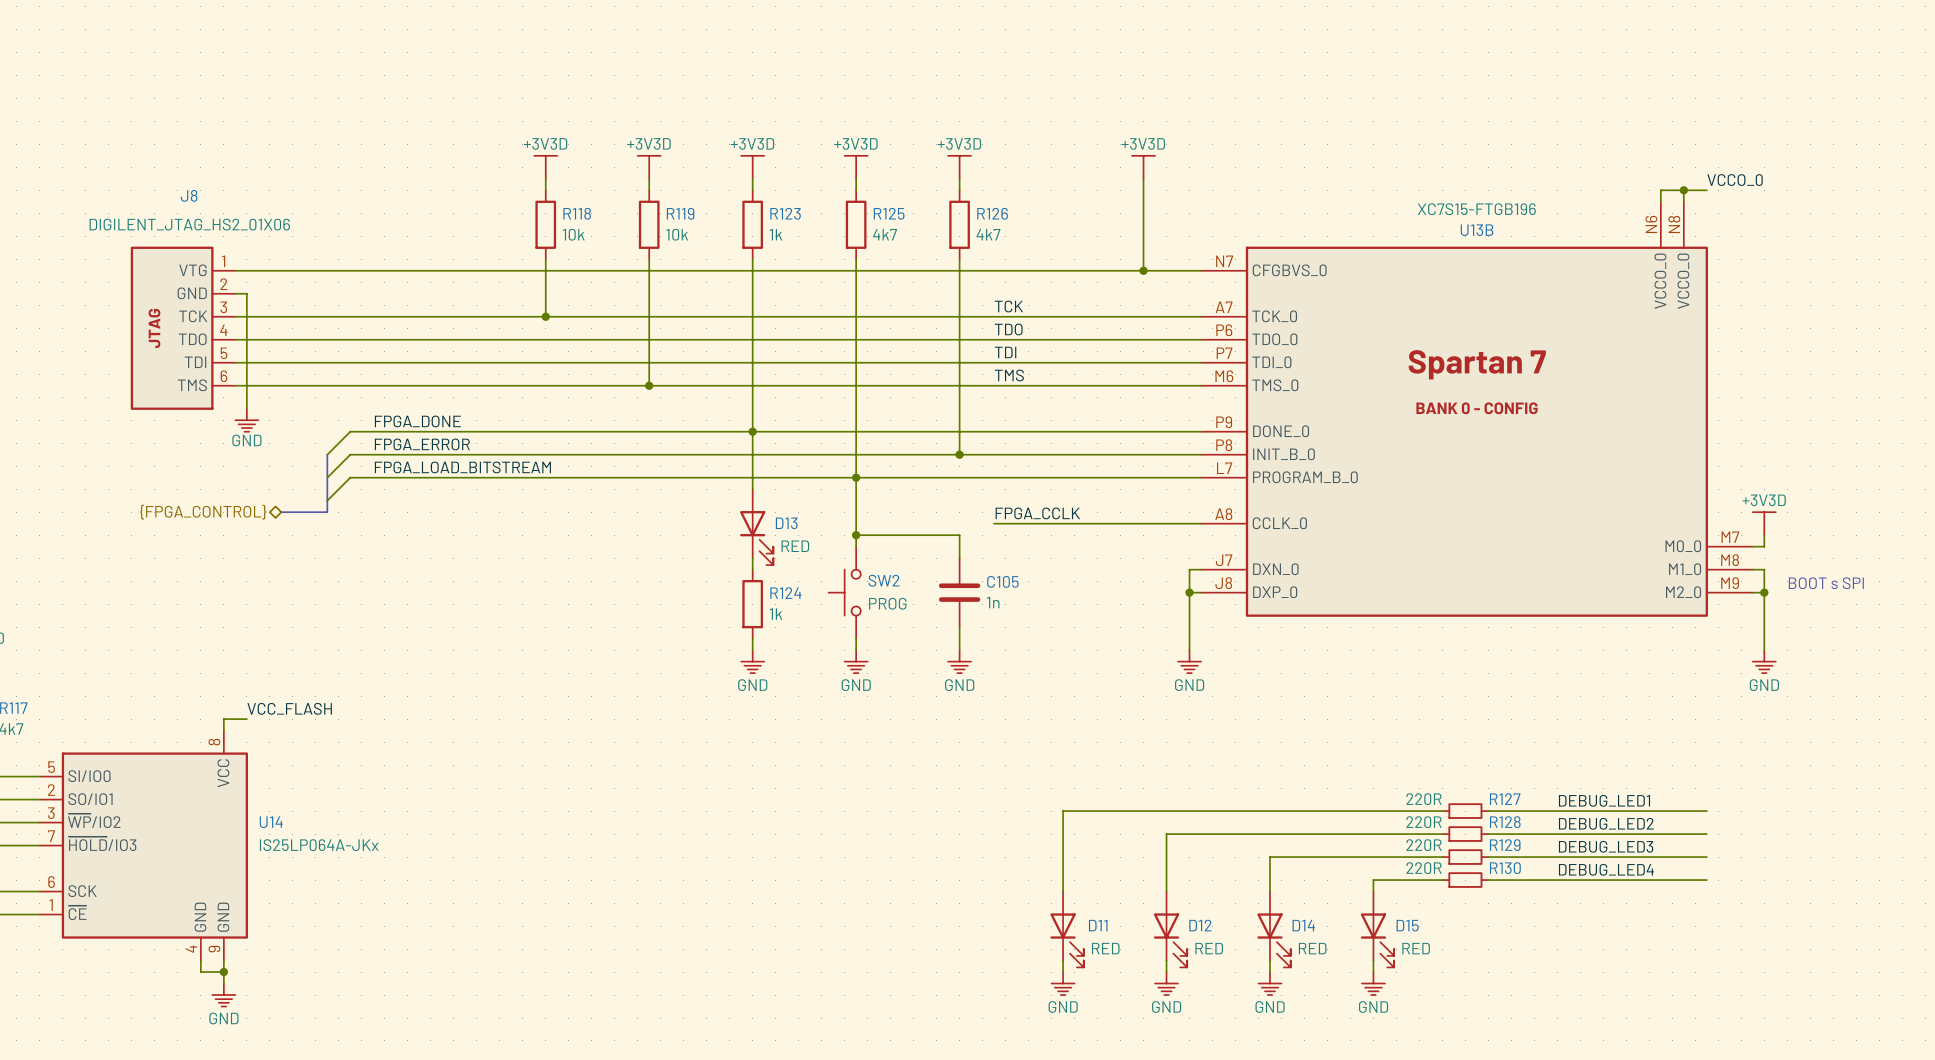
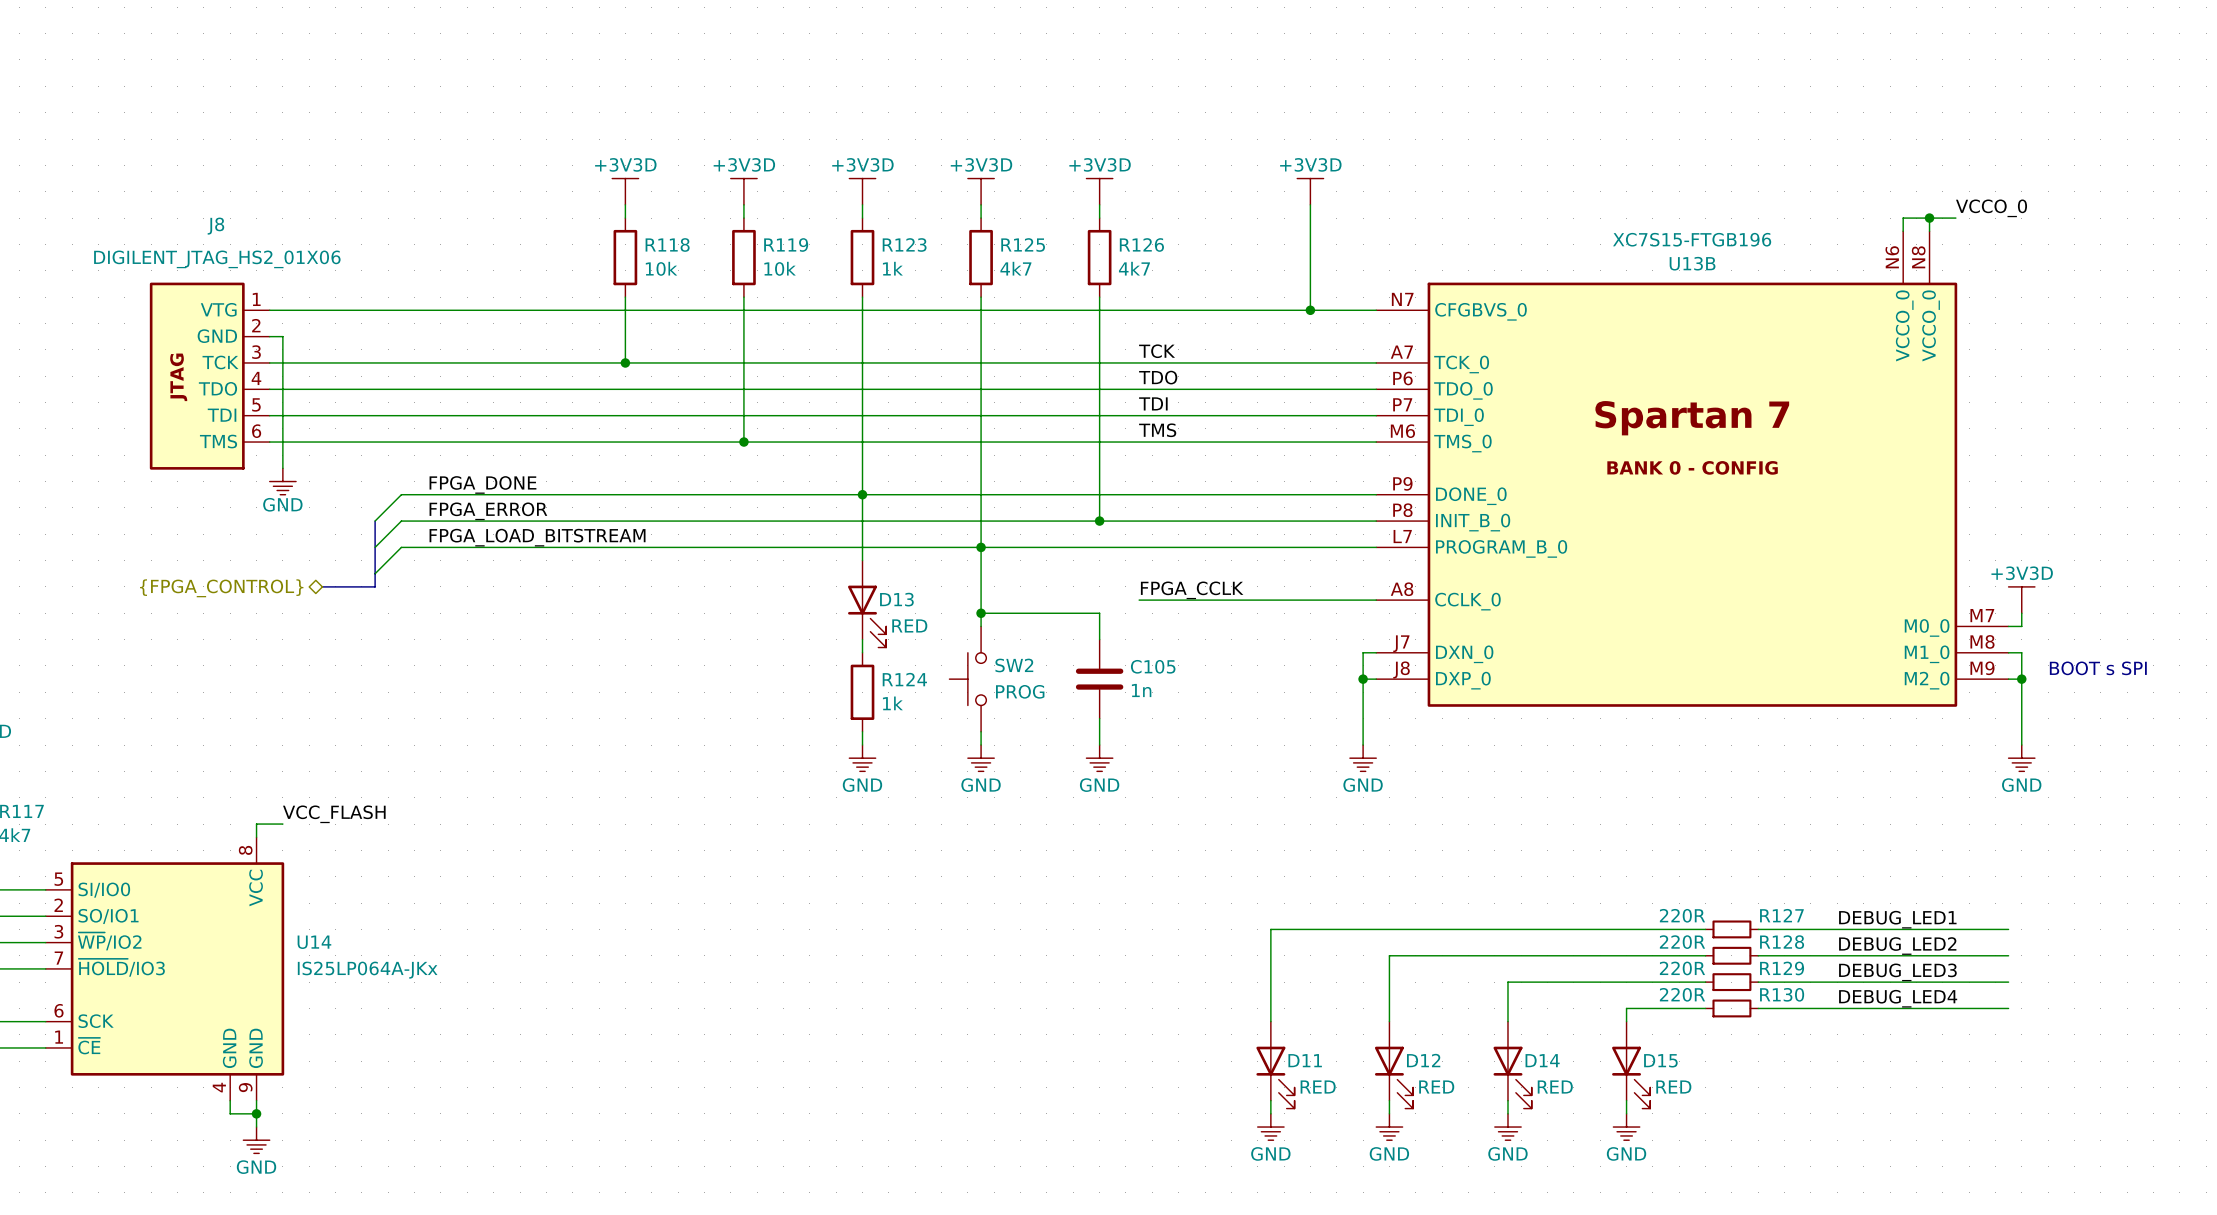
label position: DEBUG_LED1 (1604, 800) -> DEBUG_LED1 (1897, 919)
wire: (1109, 811) (1063, 811) (1063, 891) -> (1270, 929) (1270, 1021)
R127 position: (1465, 811) -> (1731, 929)
wire: (1488, 811) (1534, 811) -> (1705, 929) (1652, 929)
wire: none -> (1955, 929) (2008, 929)
label position: DEBUG_LED2 (1606, 823) -> DEBUG_LED2 (1897, 946)
wire: (1212, 834) (1166, 834) (1166, 891) -> (1389, 955) (1389, 1021)
R128 position: (1465, 834) -> (1731, 955)
wire: (1488, 834) (1534, 834) -> (1705, 955) (1652, 955)
wire: none -> (1955, 955) (2008, 955)
label position: DEBUG_LED3 (1606, 846) -> DEBUG_LED3 (1897, 972)
wire: (1315, 857) (1269, 857) (1269, 891) -> (1507, 982) (1507, 1021)
R129 position: (1465, 857) -> (1731, 982)
wire: (1488, 857) (1534, 857) -> (1705, 982) (1652, 982)
wire: none -> (1955, 982) (2008, 982)
label position: DEBUG_LED4 (1606, 869) -> DEBUG_LED4 (1898, 998)
wire: (1419, 880) (1373, 880) (1373, 891) -> (1626, 1008) (1626, 1021)
R130 position: (1465, 880) -> (1731, 1008)
wire: (1488, 880) (1534, 880) -> (1705, 1008) (1652, 1008)
wire: none -> (1955, 1008) (2008, 1008)
D11 position: (1067, 929) -> (1275, 1065)
D12 position: (1170, 929) -> (1394, 1065)
D14 position: (1274, 929) -> (1512, 1065)
D15 position: (1377, 929) -> (1631, 1065)
wire: (1063, 960) (1063, 972) -> (1270, 1100) (1270, 1113)
wire: (1166, 960) (1166, 972) -> (1389, 1100) (1389, 1113)
wire: (1269, 960) (1269, 972) -> (1507, 1100) (1507, 1113)
wire: (1373, 960) (1373, 972) -> (1626, 1100) (1626, 1113)
power symbol: GND (1063, 983) -> none
power symbol: none -> GND (1270, 1127)
power symbol: GND (1166, 983) -> none
power symbol: none -> GND (1389, 1127)
power symbol: GND (1269, 983) -> none
power symbol: none -> GND (1507, 1127)
power symbol: GND (1373, 983) -> none
power symbol: none -> GND (1626, 1127)

